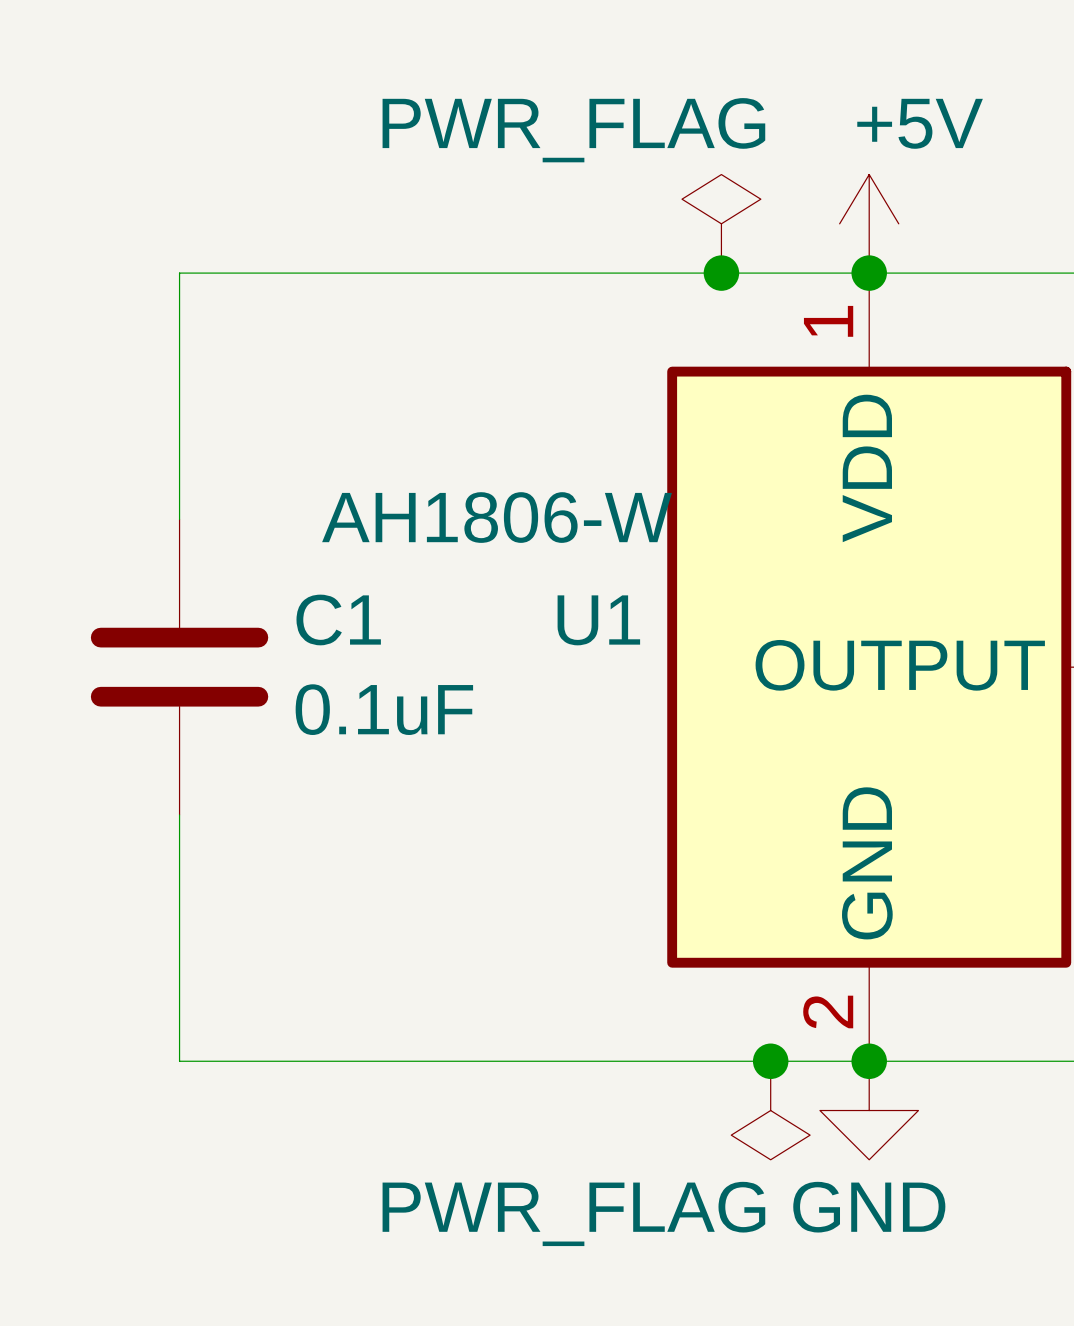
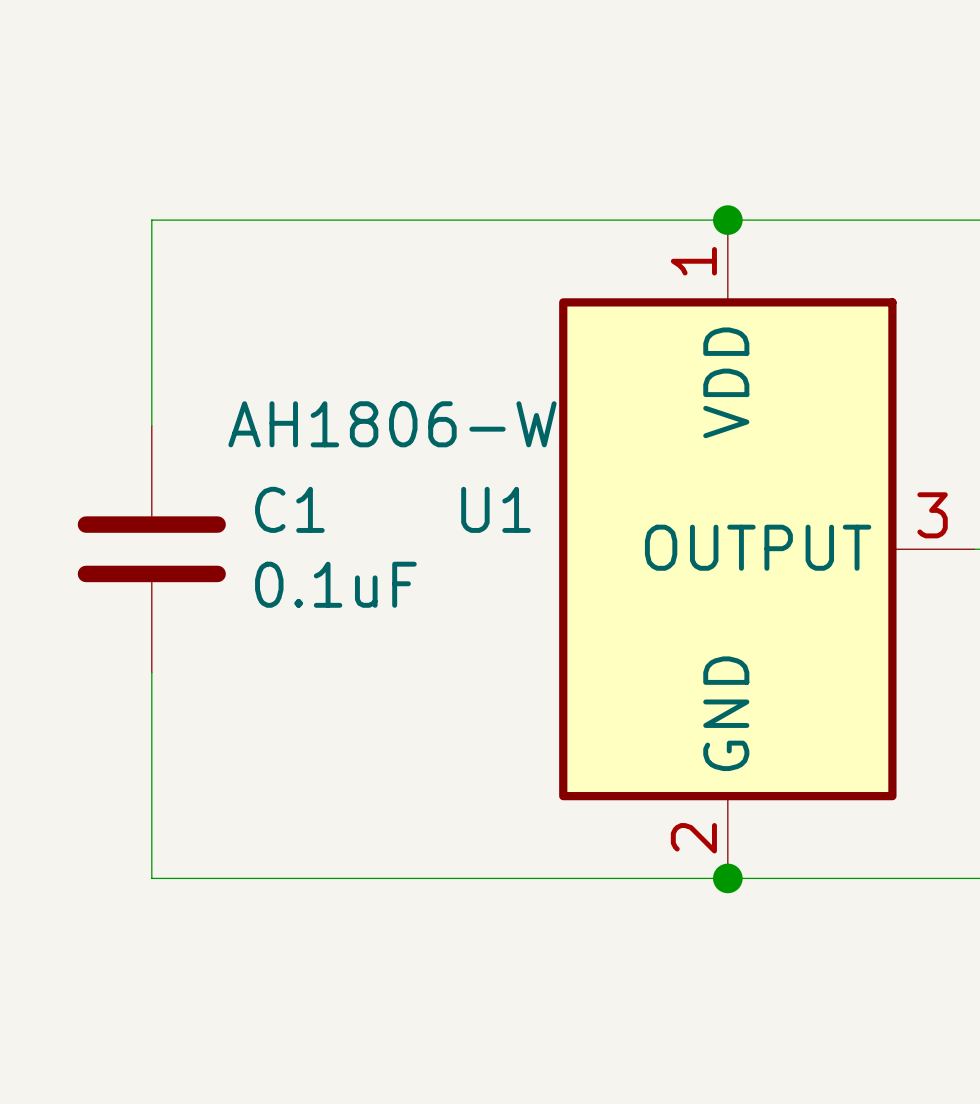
power symbol: PWR_FLAG (721, 223) -> none
power symbol: +5V (869, 223) -> none
junction: (721, 273) -> none
junction: (770, 1061) -> none
power symbol: PWR_FLAG (770, 1110) -> none
power symbol: GND (869, 1110) -> none

